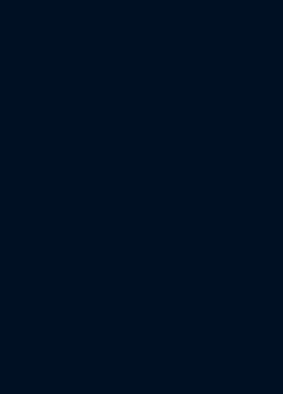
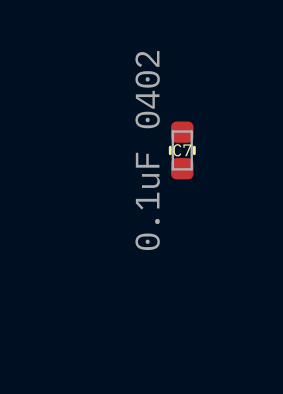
C7: none -> 0.1uF 0402 (182, 150)

